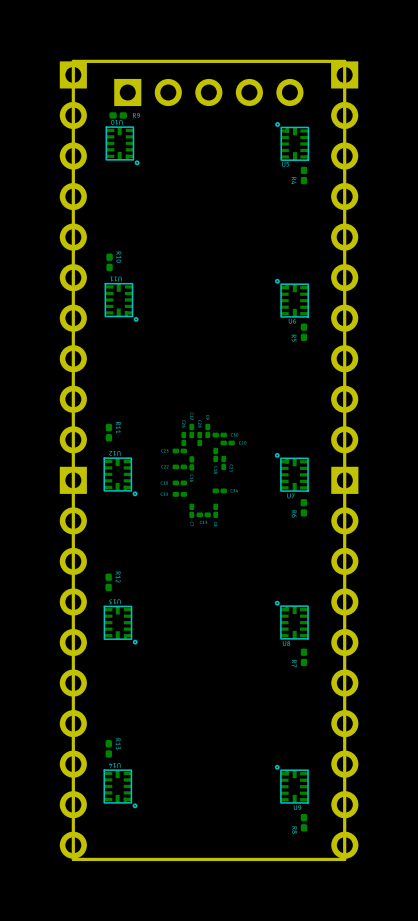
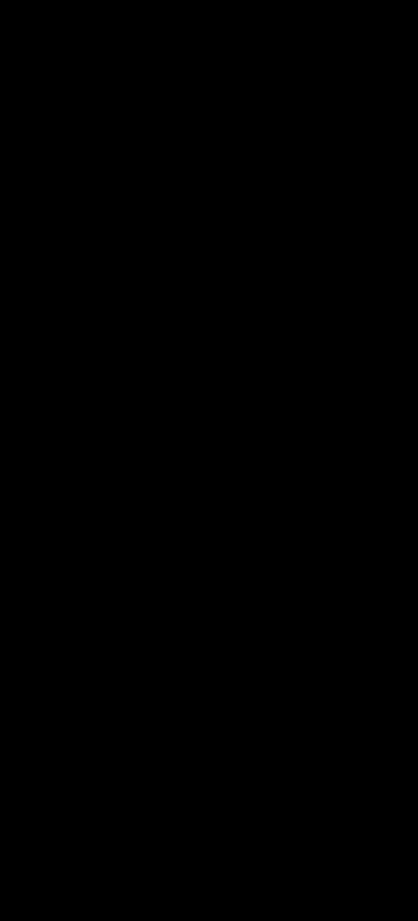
board edge: (344, 61) (73, 61) (73, 859) (344, 859) (344, 61) -> none
part: (208, 92) -> none
part: (118, 115) -> none
part: (291, 141) -> none
part: (122, 146) -> none
part: (303, 175) -> none
part: (73, 257) -> none
part: (344, 257) -> none
part: (109, 262) -> none
part: (291, 297) -> none
part: (121, 302) -> none
part: (303, 332) -> none
part: (191, 431) -> none
part: (207, 431) -> none
part: (108, 432) -> none
part: (219, 435) -> none
part: (183, 439) -> none
part: (199, 439) -> none
part: (227, 443) -> none
part: (179, 450) -> none
part: (215, 454) -> none
part: (223, 462) -> none
part: (191, 463) -> none
part: (179, 466) -> none
part: (291, 472) -> none
part: (120, 477) -> none
part: (179, 482) -> none
part: (219, 490) -> none
part: (179, 494) -> none
part: (303, 507) -> none
part: (191, 510) -> none
part: (215, 510) -> none
part: (203, 514) -> none
part: (108, 582) -> none
part: (291, 619) -> none
part: (120, 625) -> none
part: (303, 657) -> none
part: (73, 662) -> none
part: (344, 662) -> none
part: (108, 748) -> none
part: (291, 783) -> none
part: (120, 789) -> none
part: (303, 822) -> none

